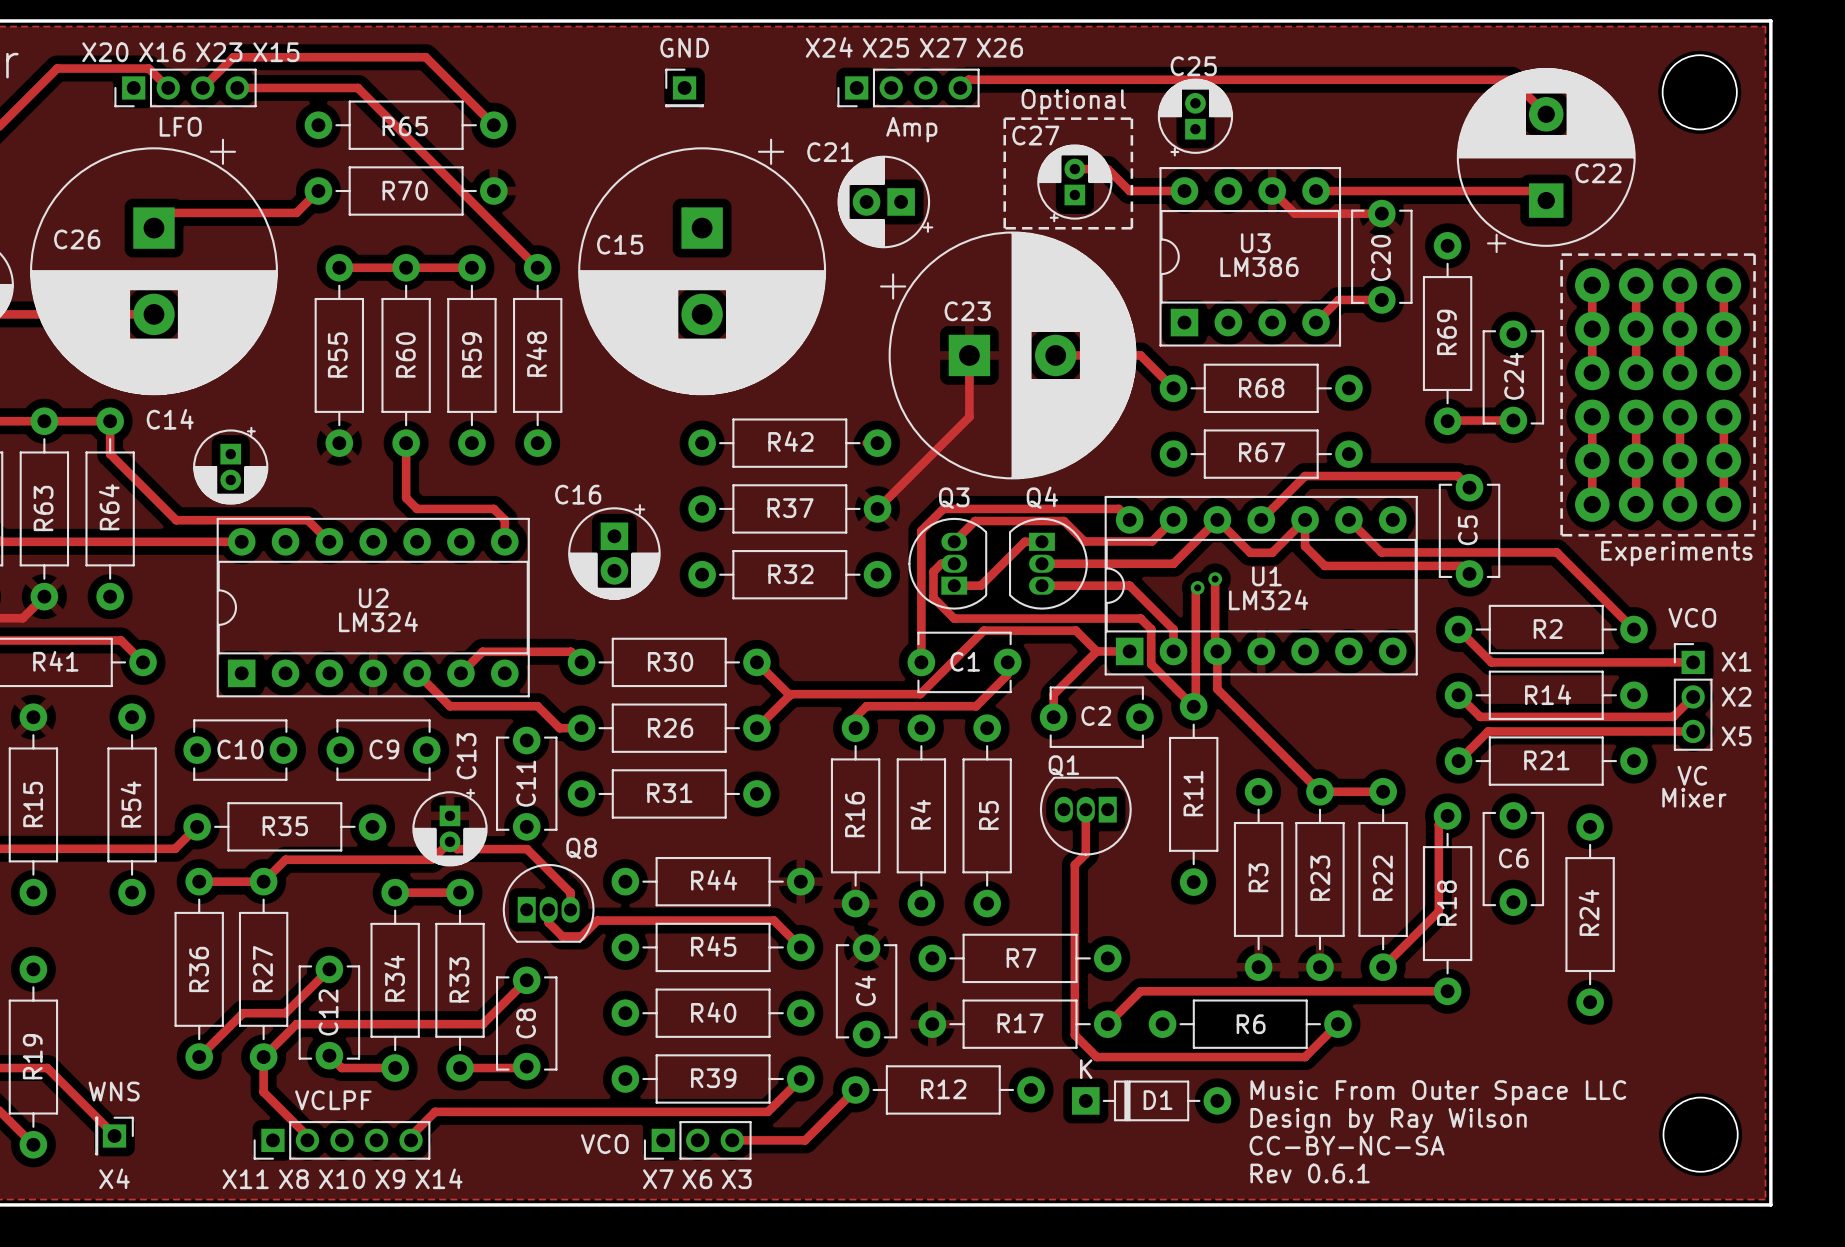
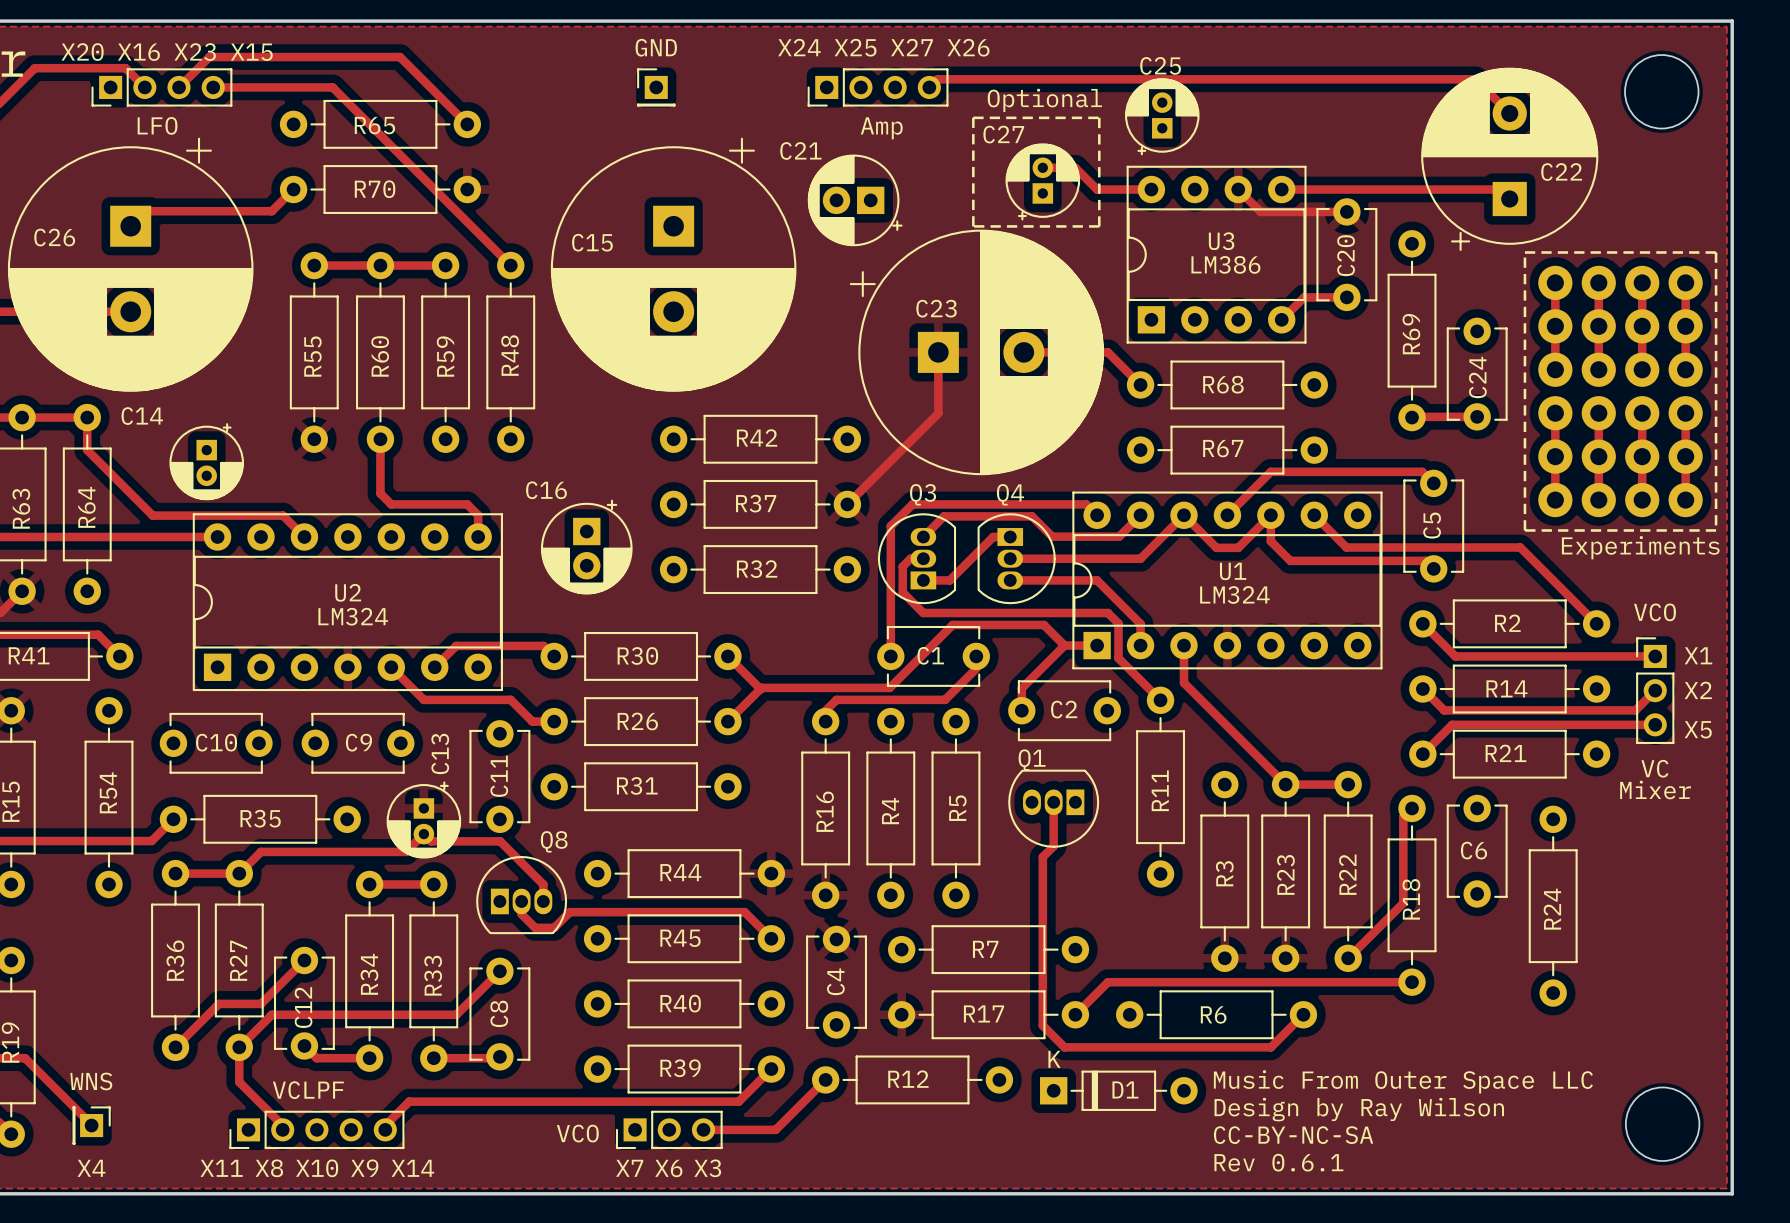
track: (1215, 579) (1215, 649) (1217, 651) -> none
via: (1215, 579) -> none
track: (1197, 587) (1195, 589) (1195, 704) (1193, 706) -> none
via: (1197, 587) -> none

